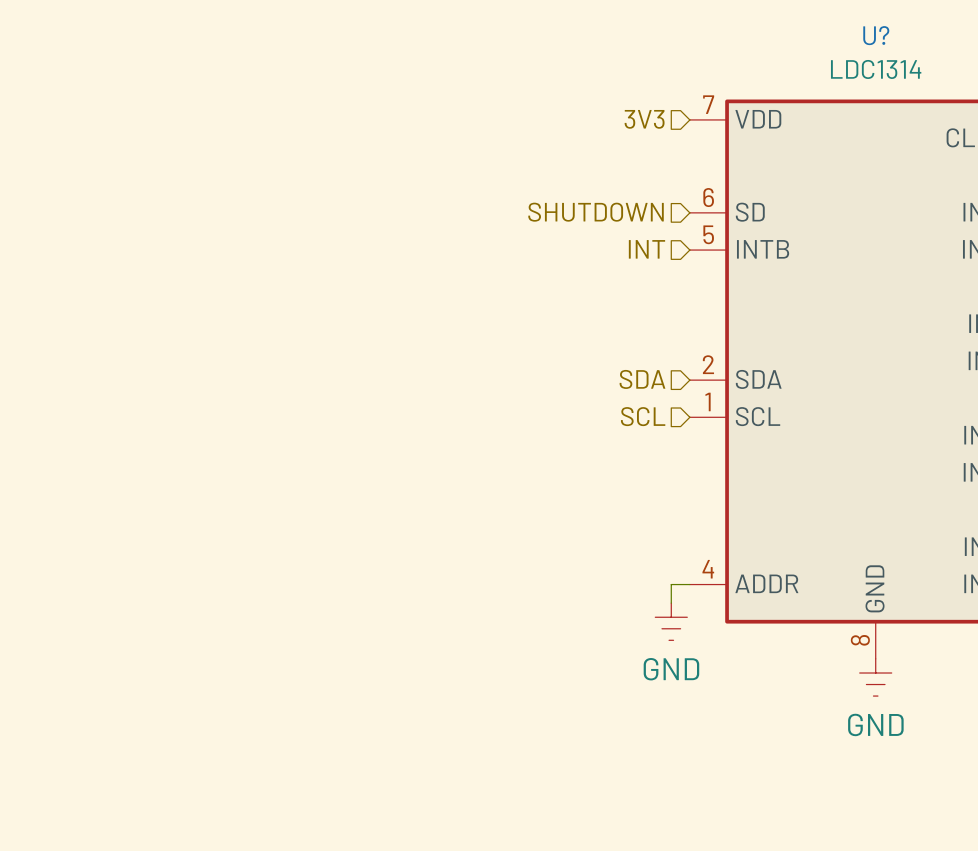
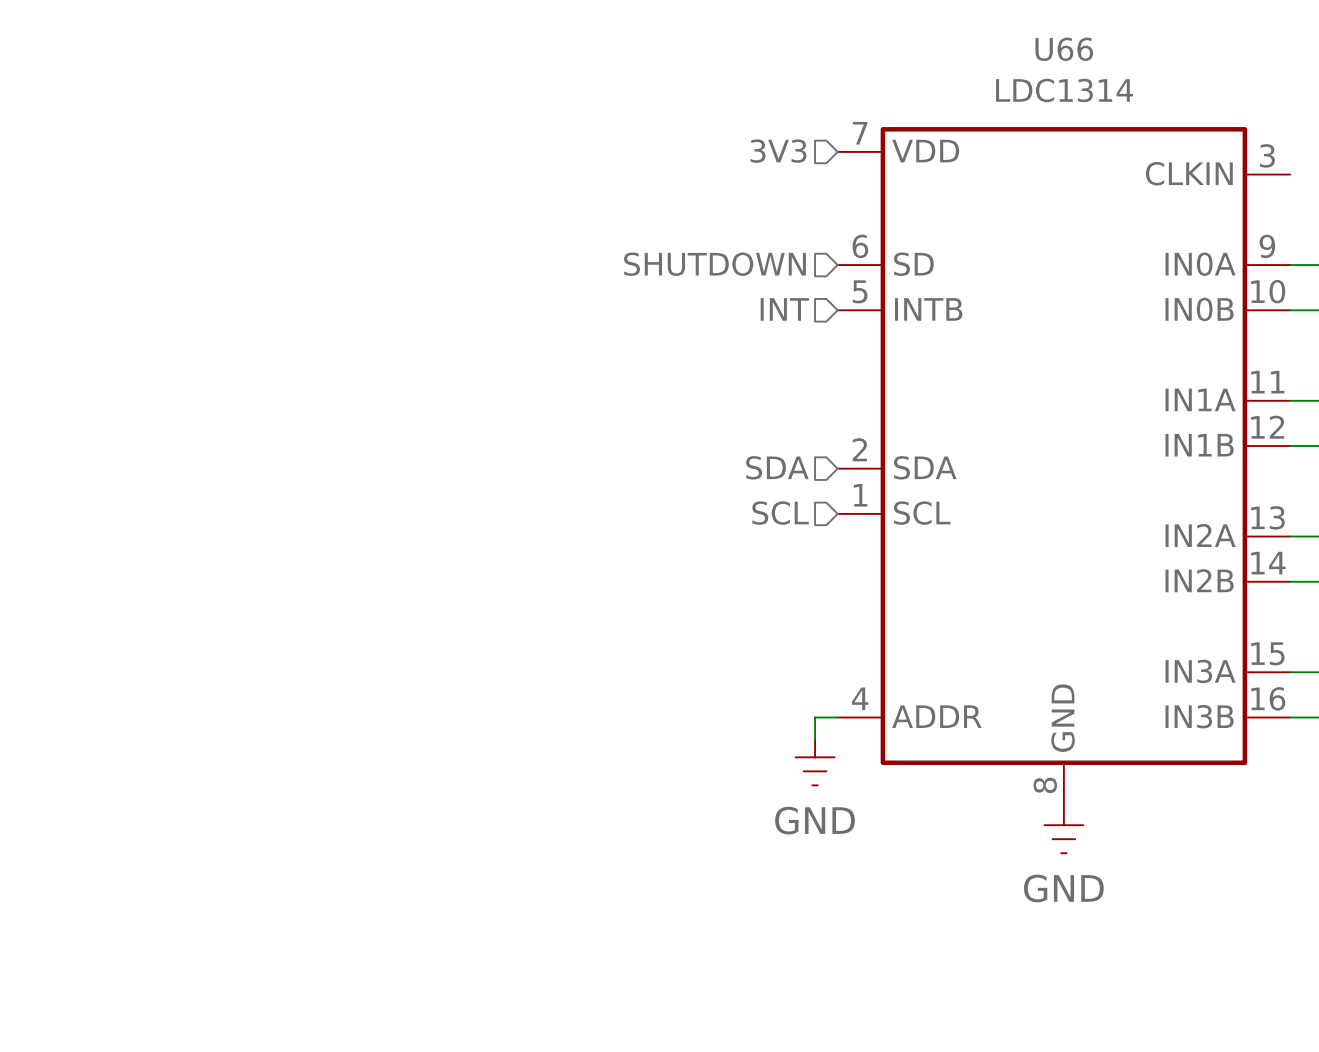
U? name: U? (876, 35) -> U66 (1064, 49)

